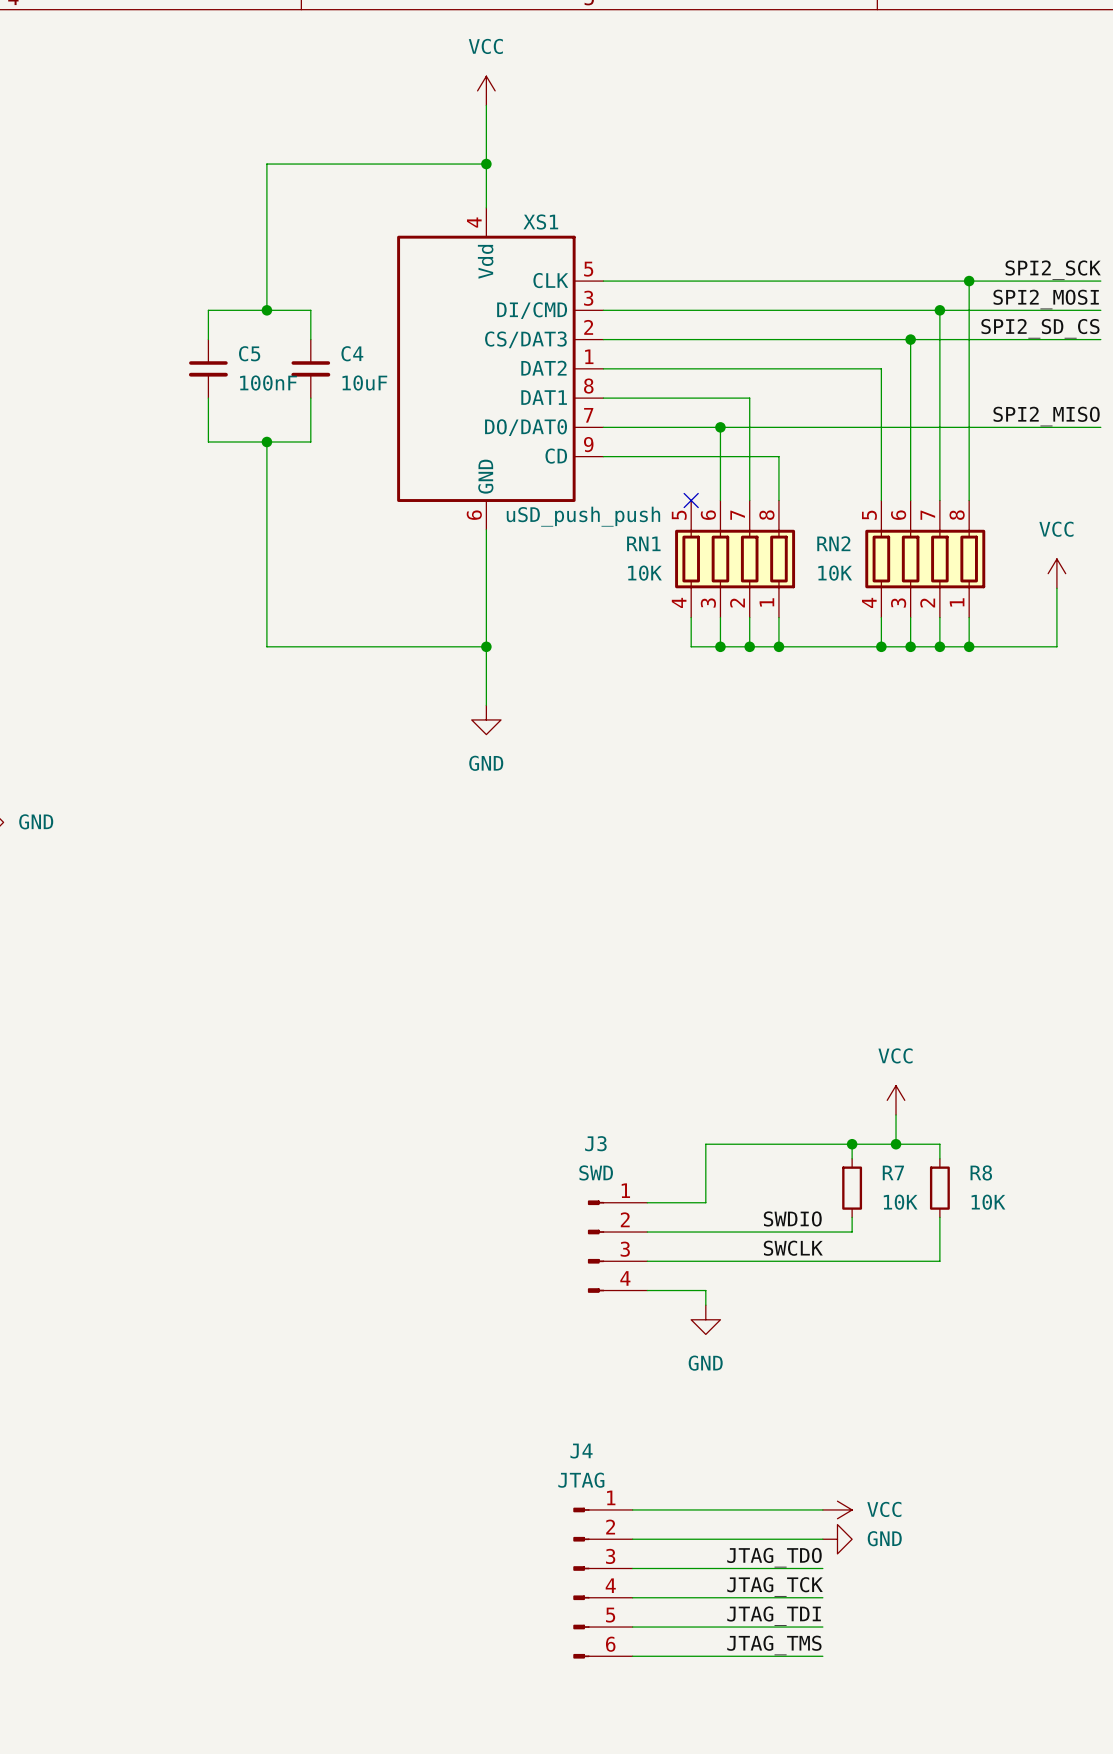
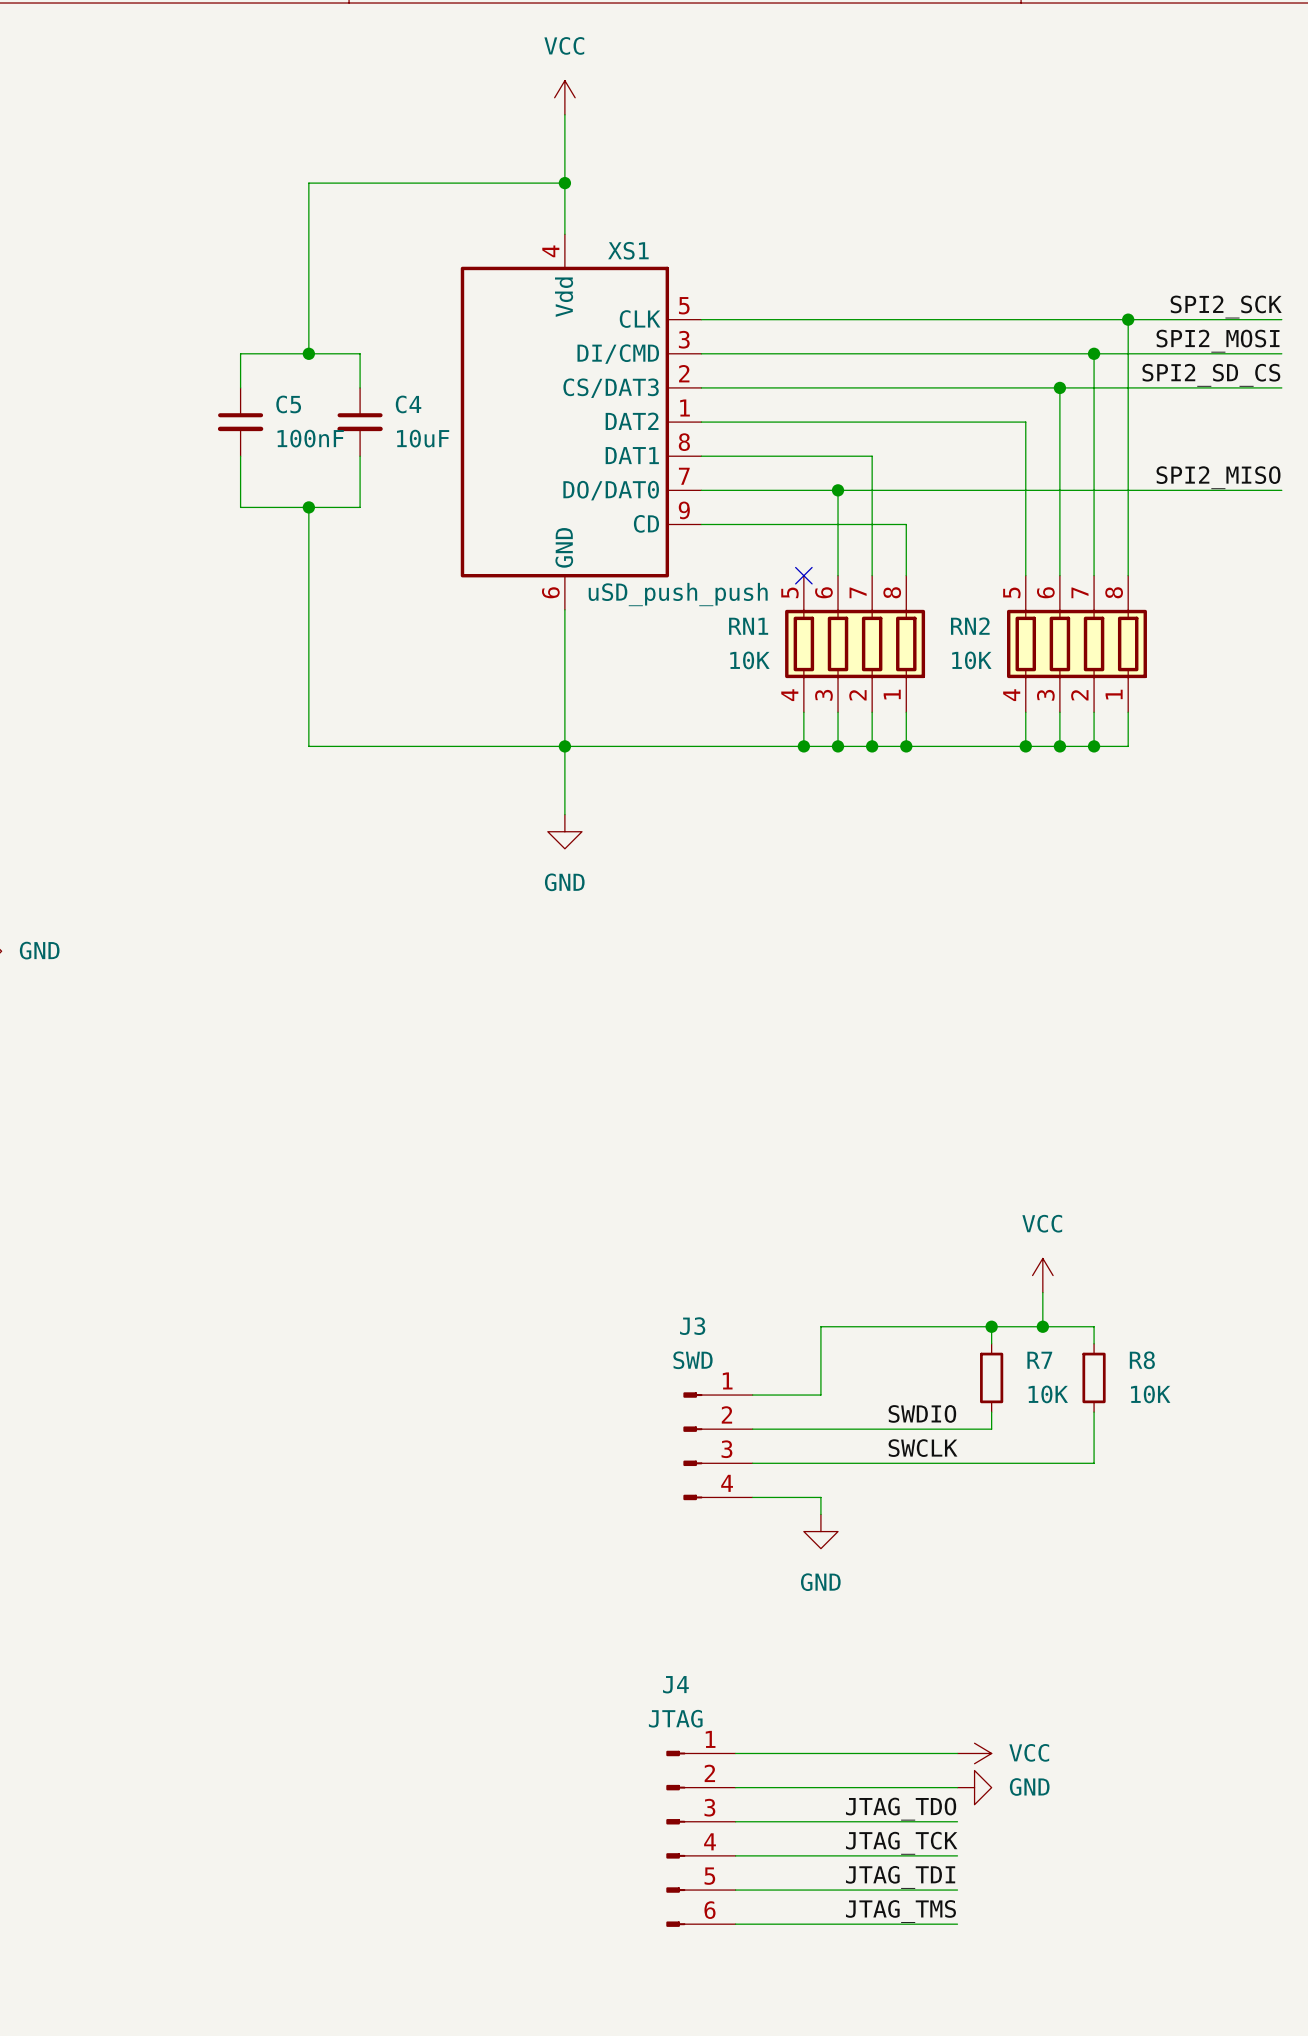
power symbol: VCC (1056, 573) -> none
wire: (1056, 588) (1056, 646) (969, 646) -> none
wire: none -> (564, 746) (803, 746)
junction: none -> (803, 746)
junction: (969, 646) -> none

